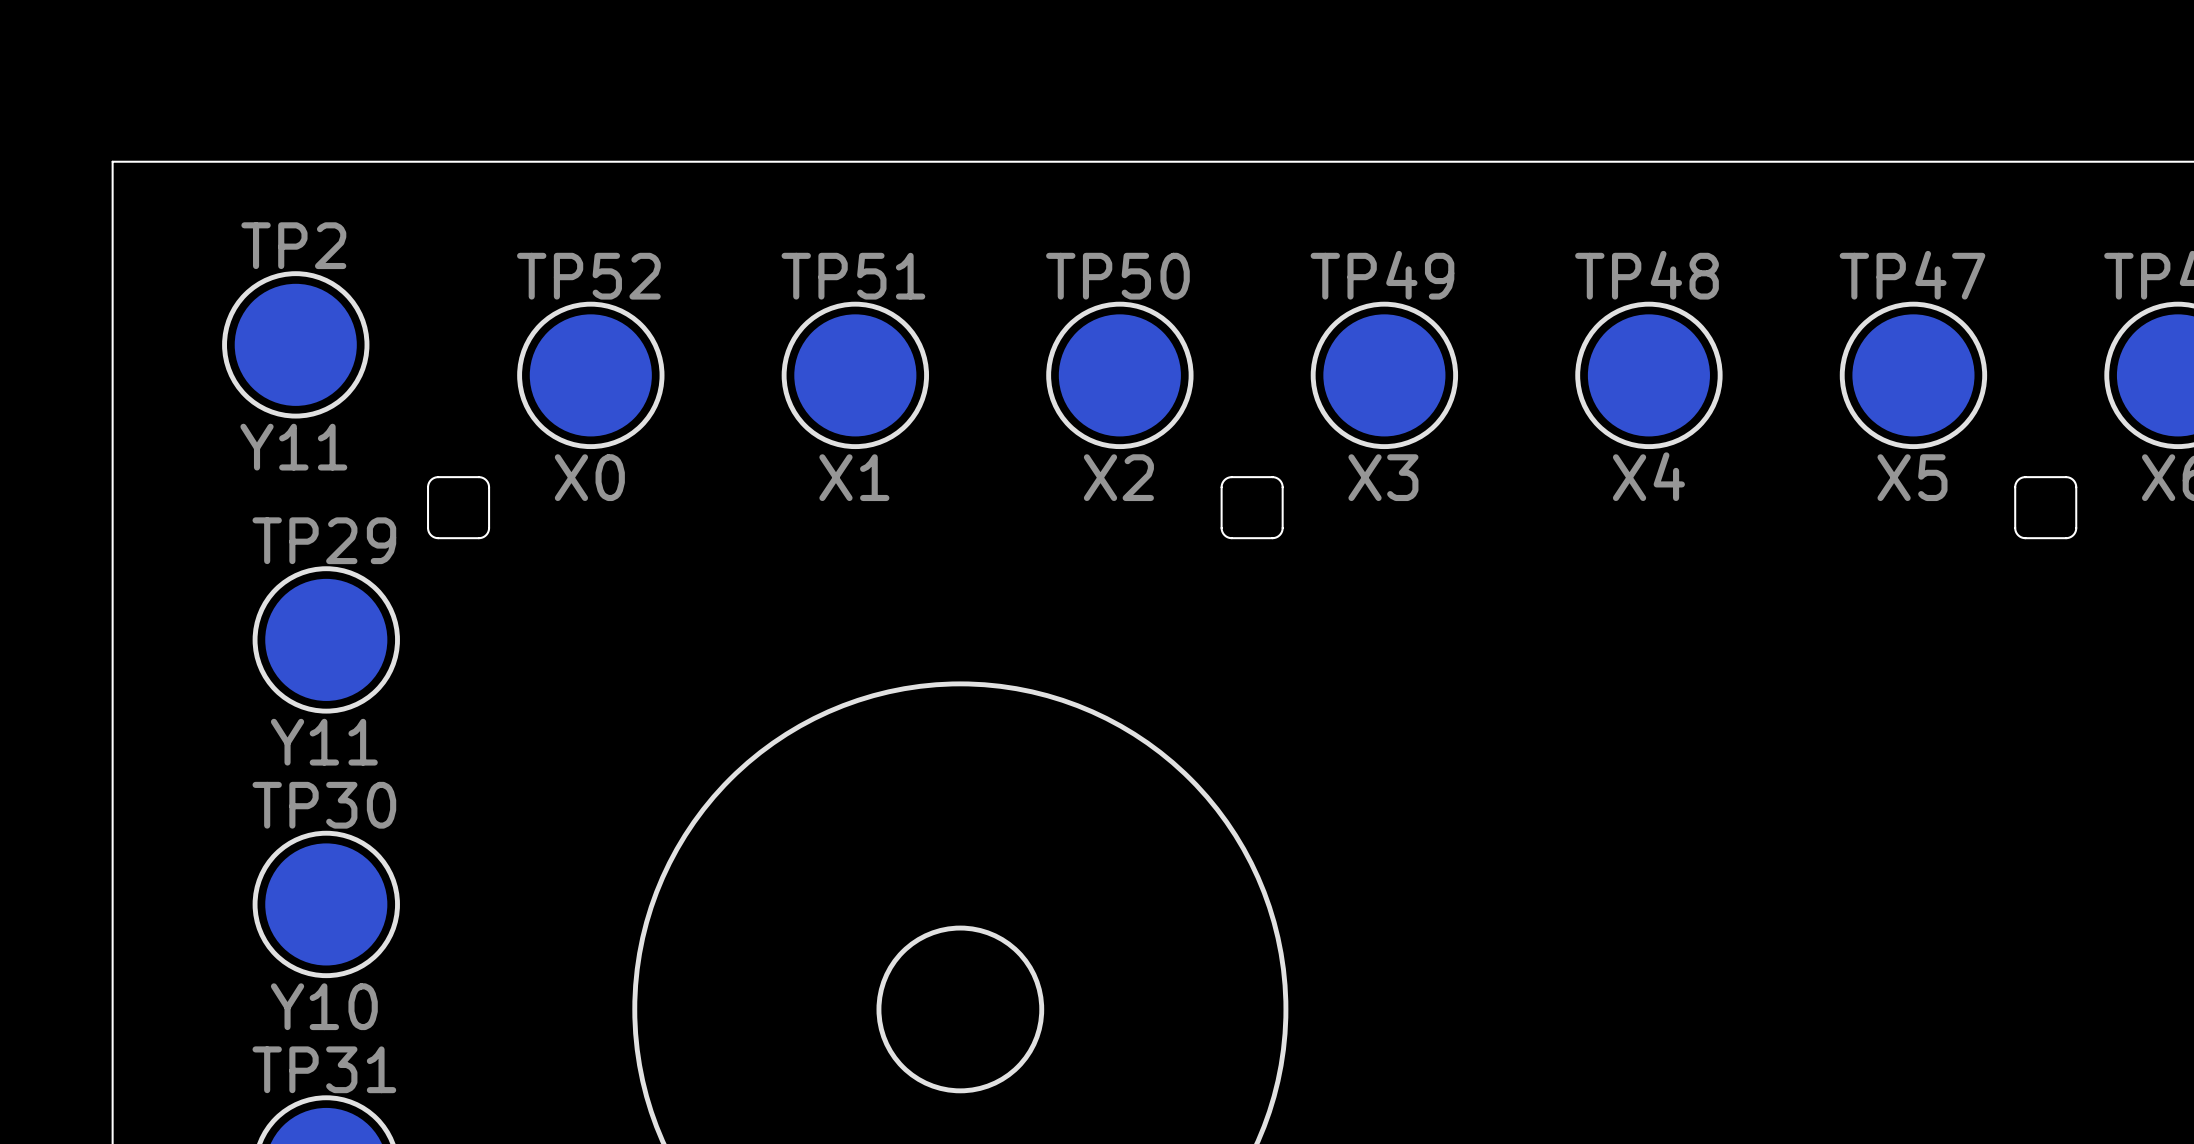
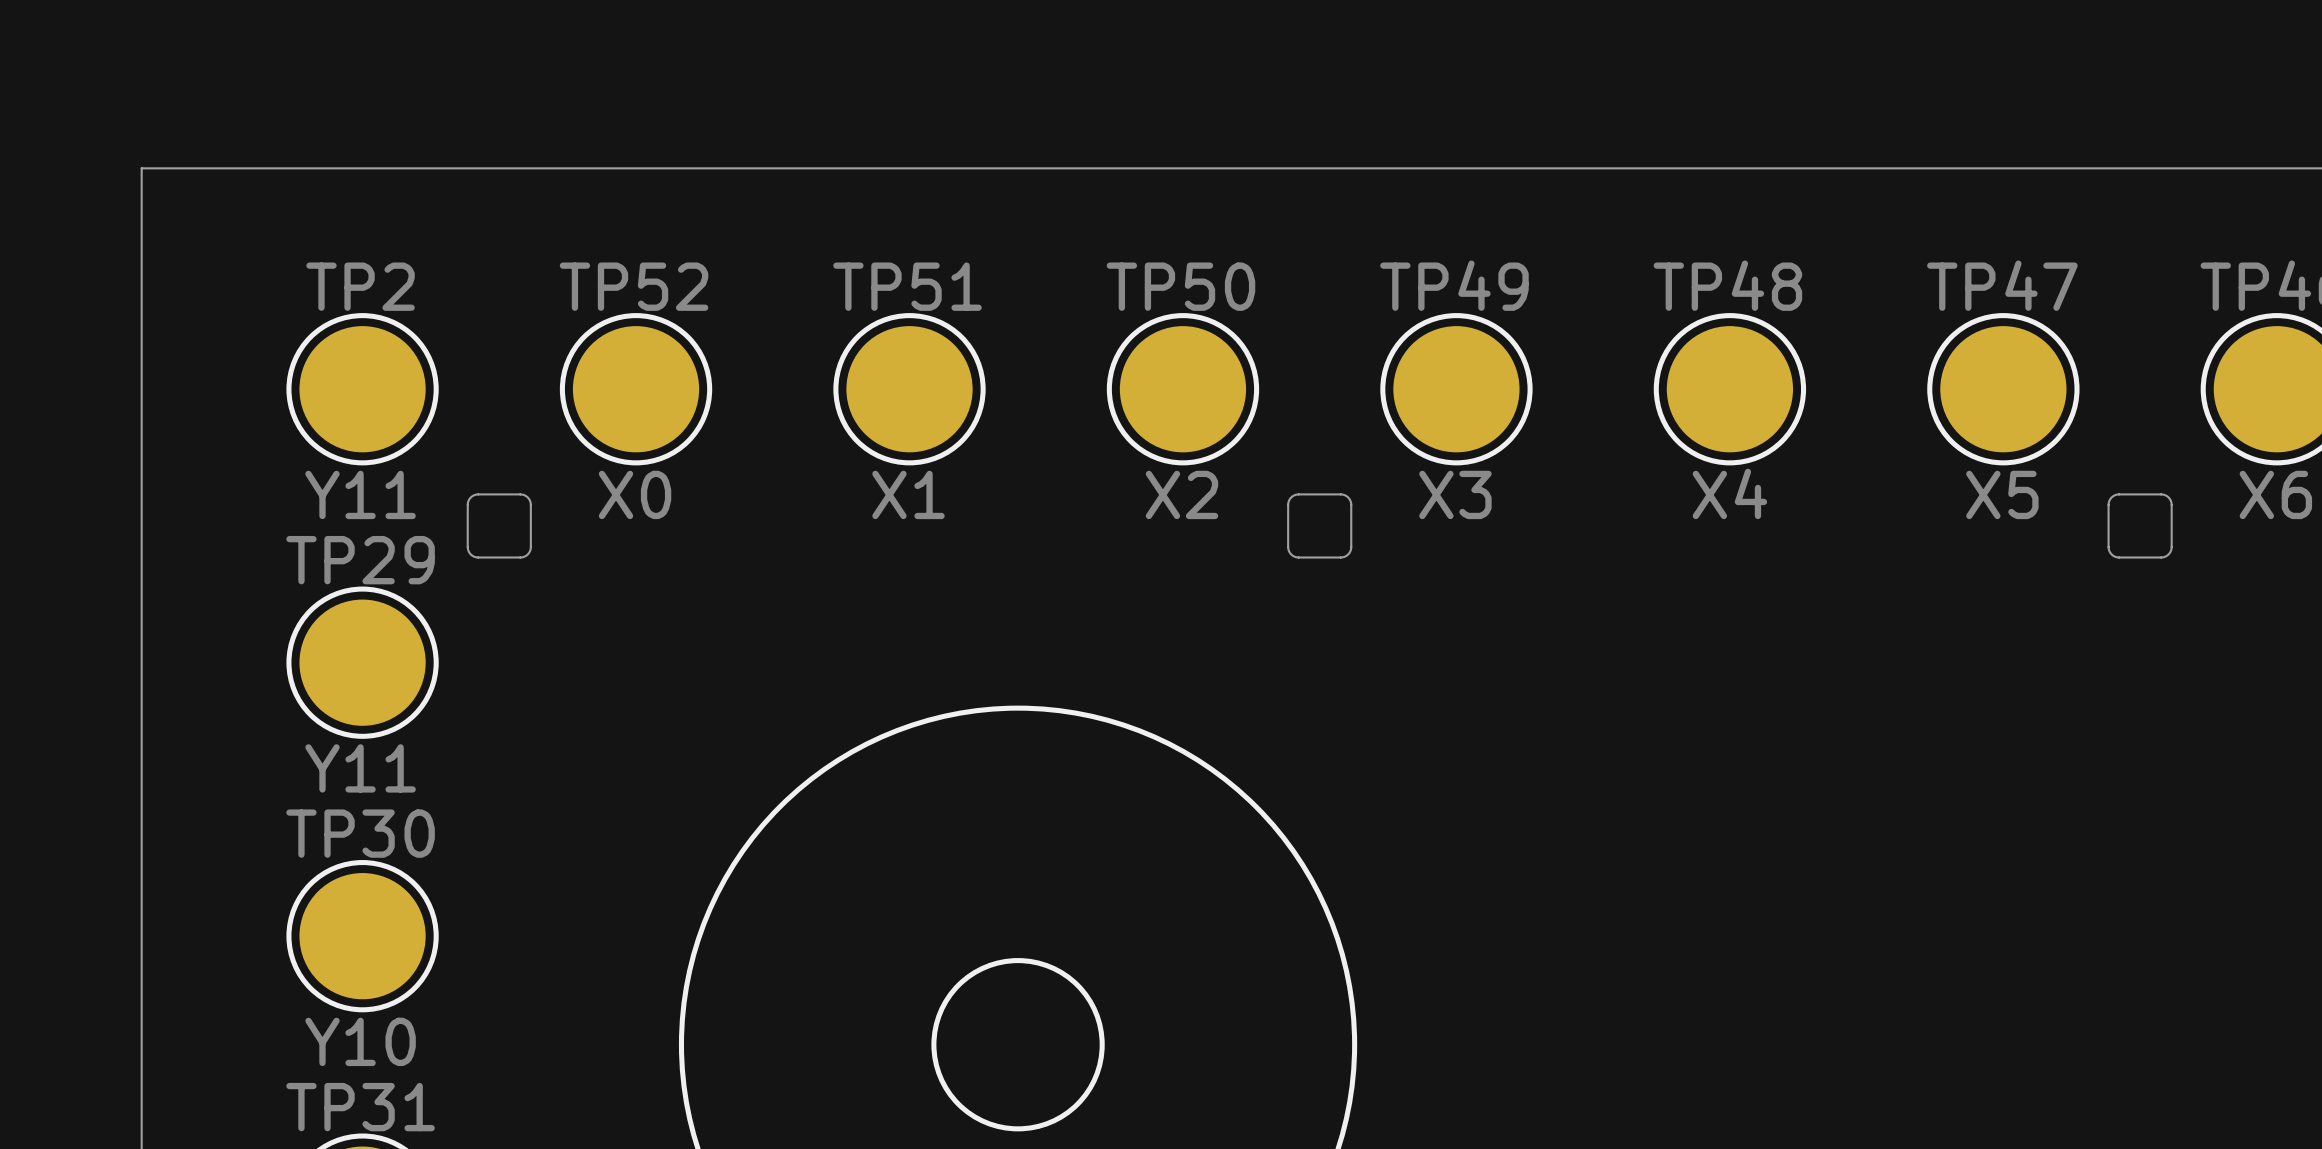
TP2 position: (295, 344) -> (362, 389)

